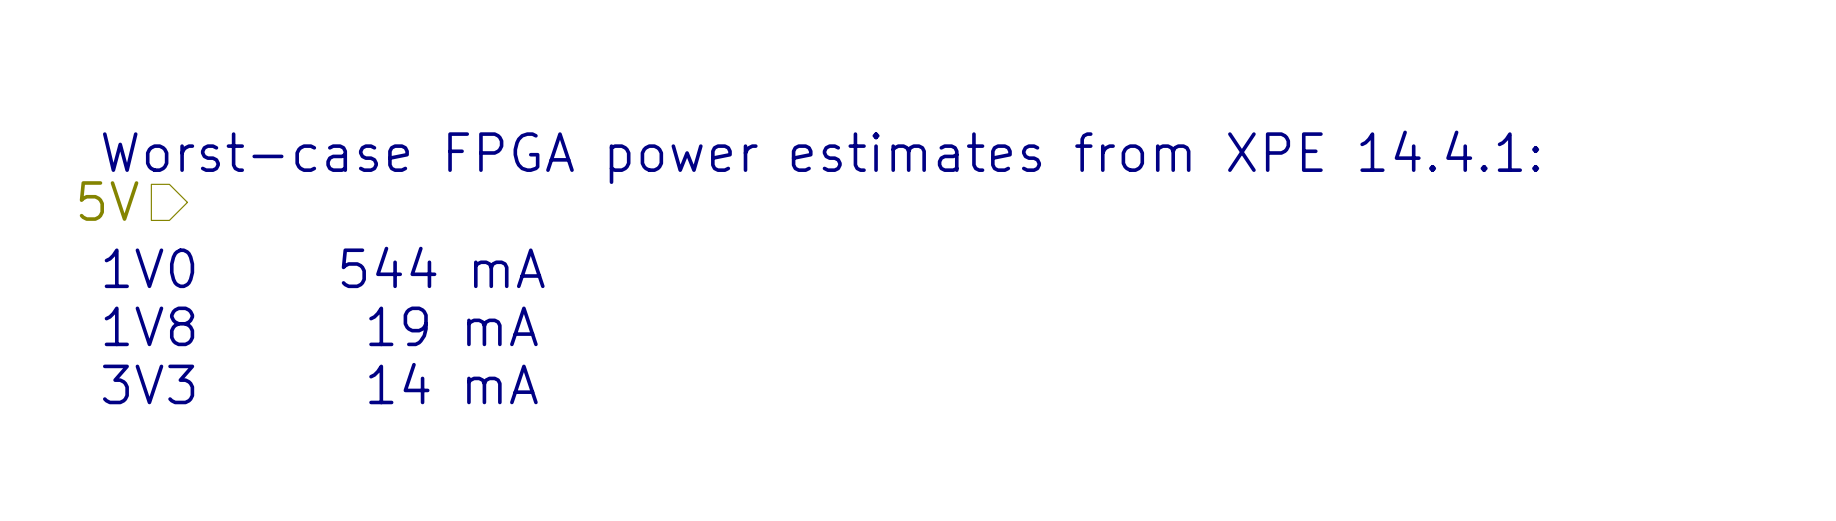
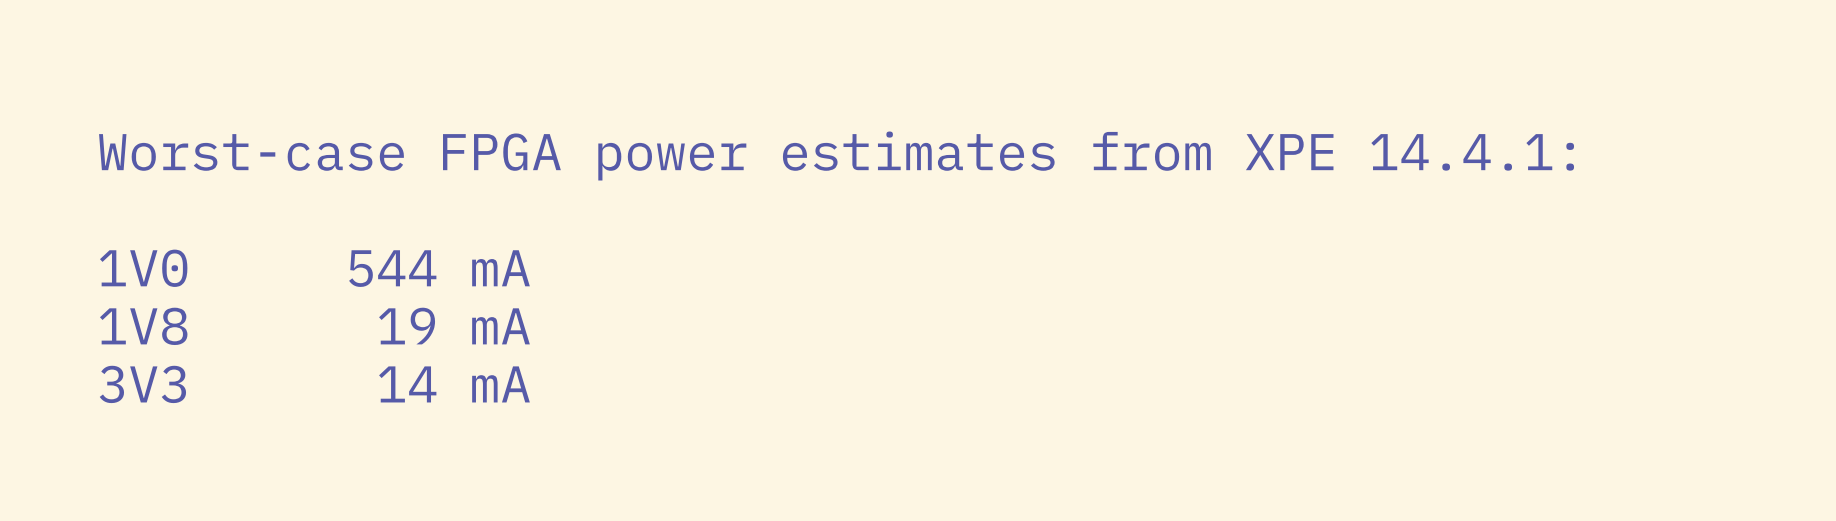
hierarchical label: 5V (109, 201) -> none

